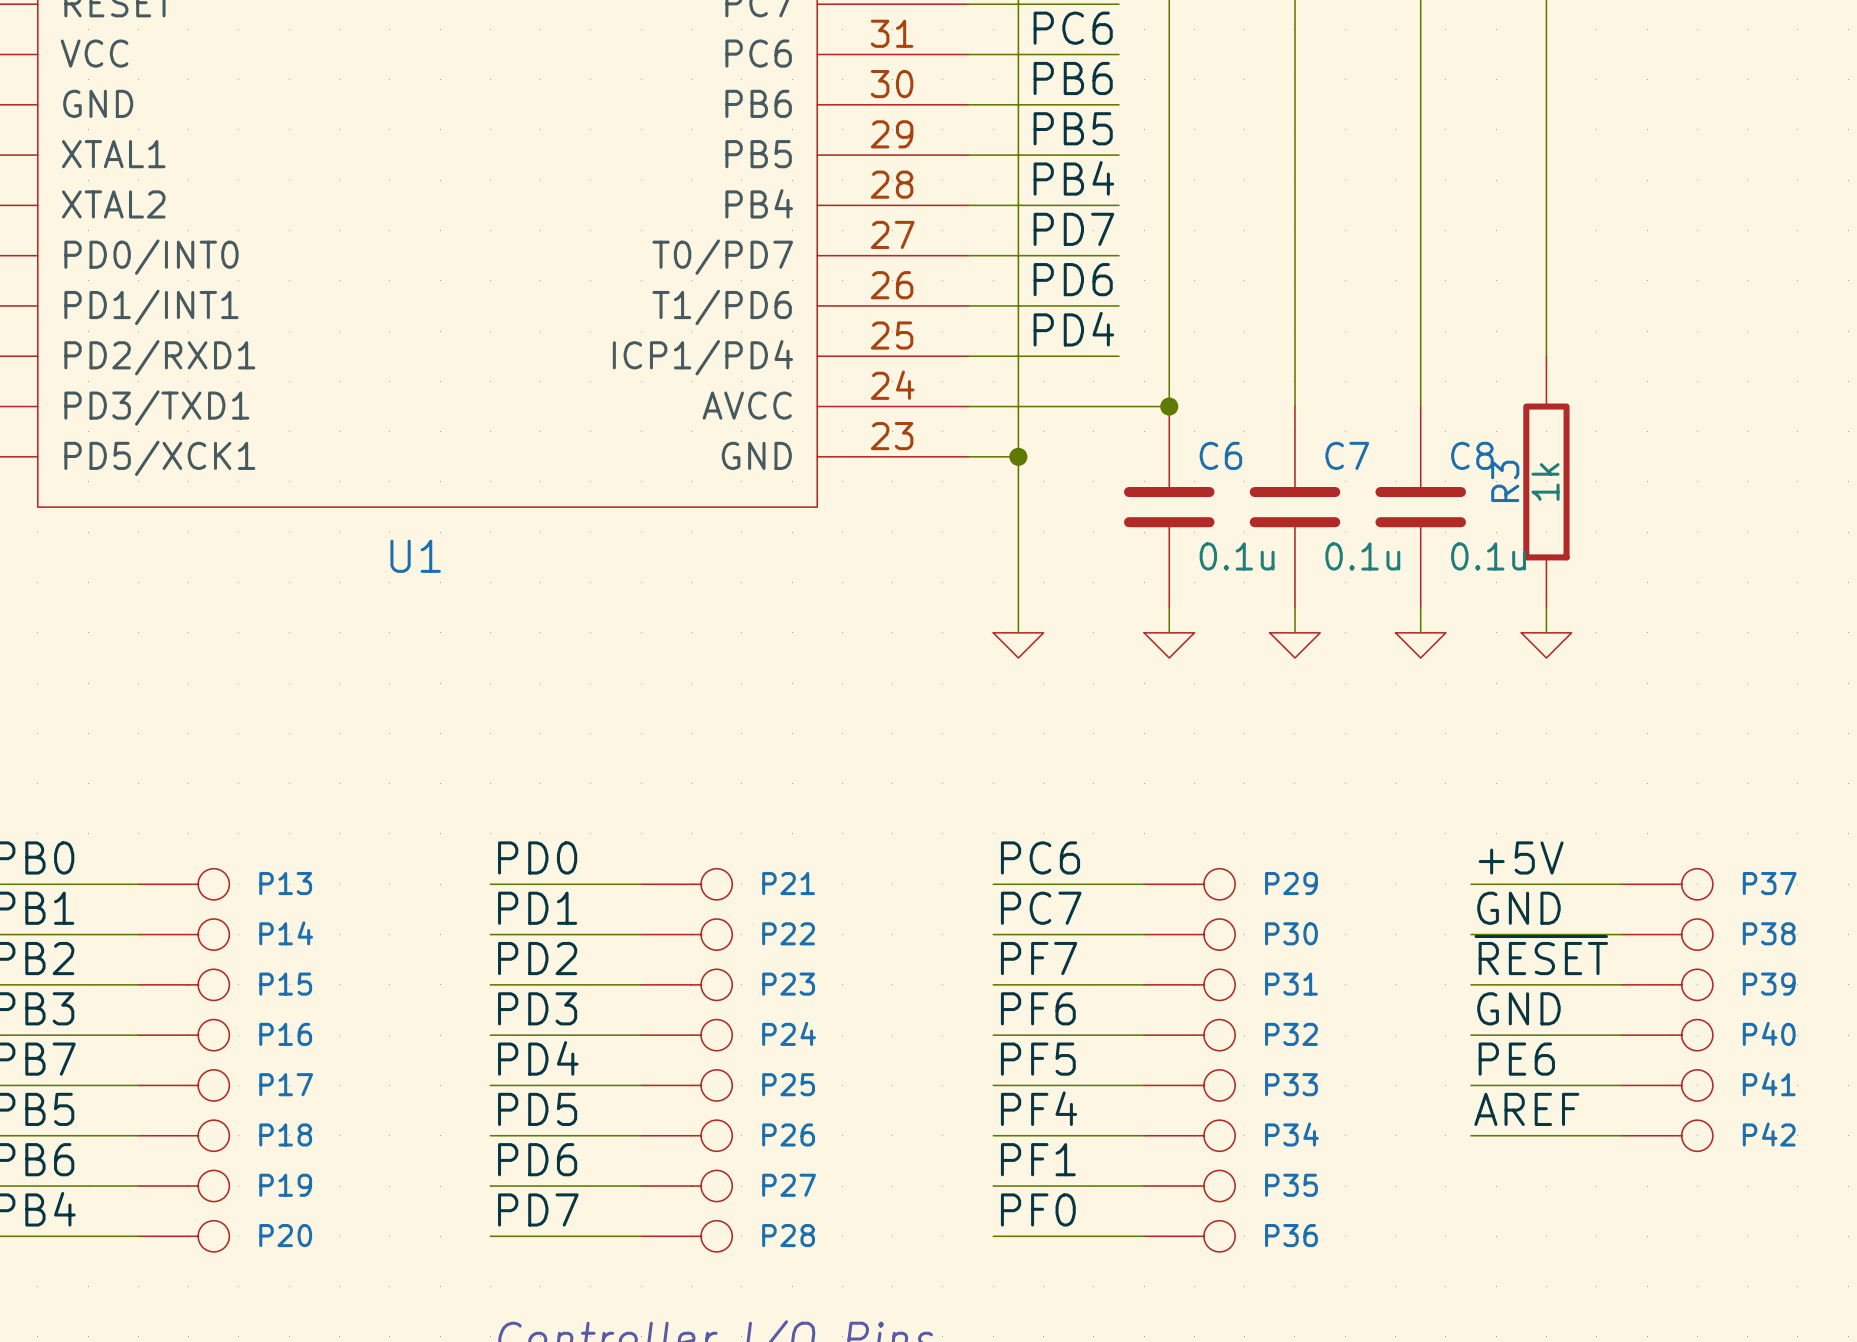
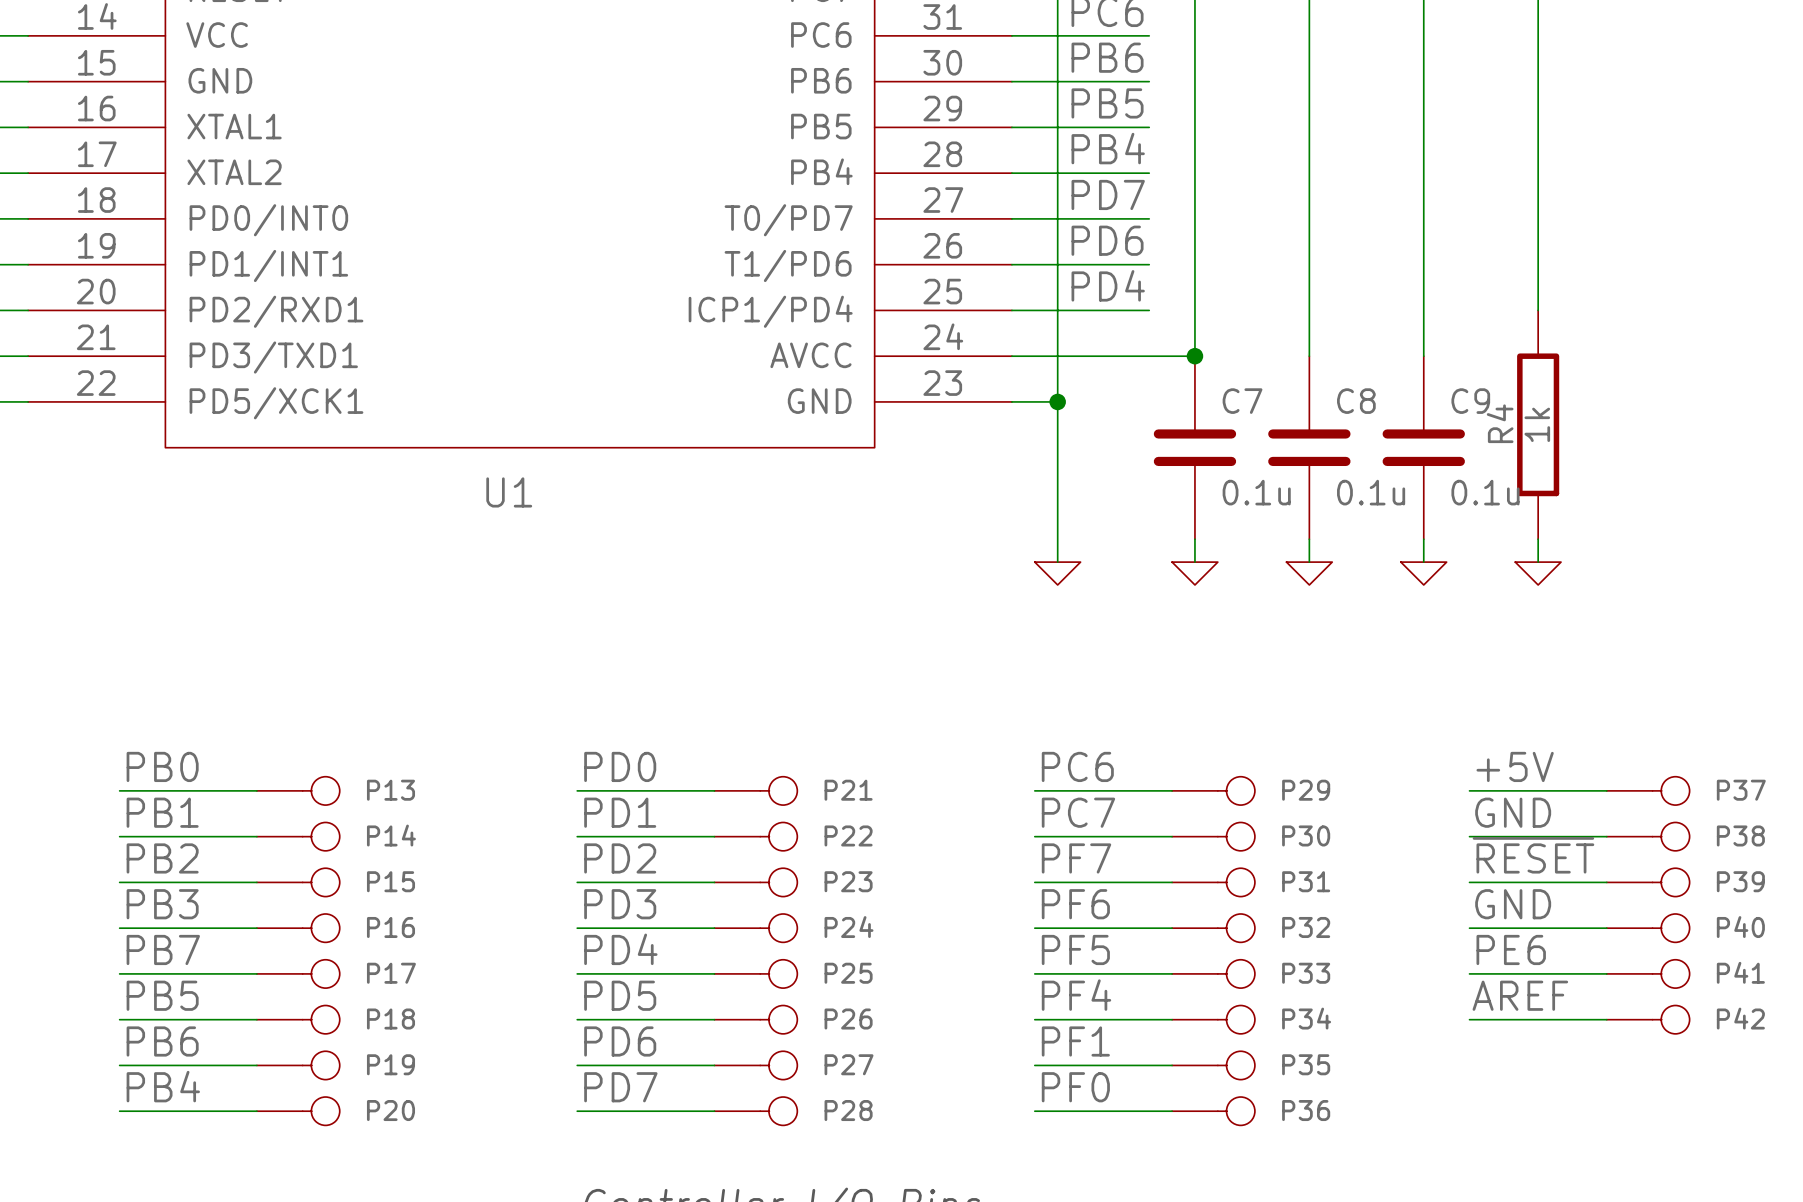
C6 name: C6 (1220, 455) -> C7 (1242, 401)
C7 name: C7 (1347, 455) -> C8 (1356, 401)
C8 name: C8 (1472, 455) -> C9 (1470, 401)
R3 name: R3 (1505, 481) -> R4 (1500, 423)

